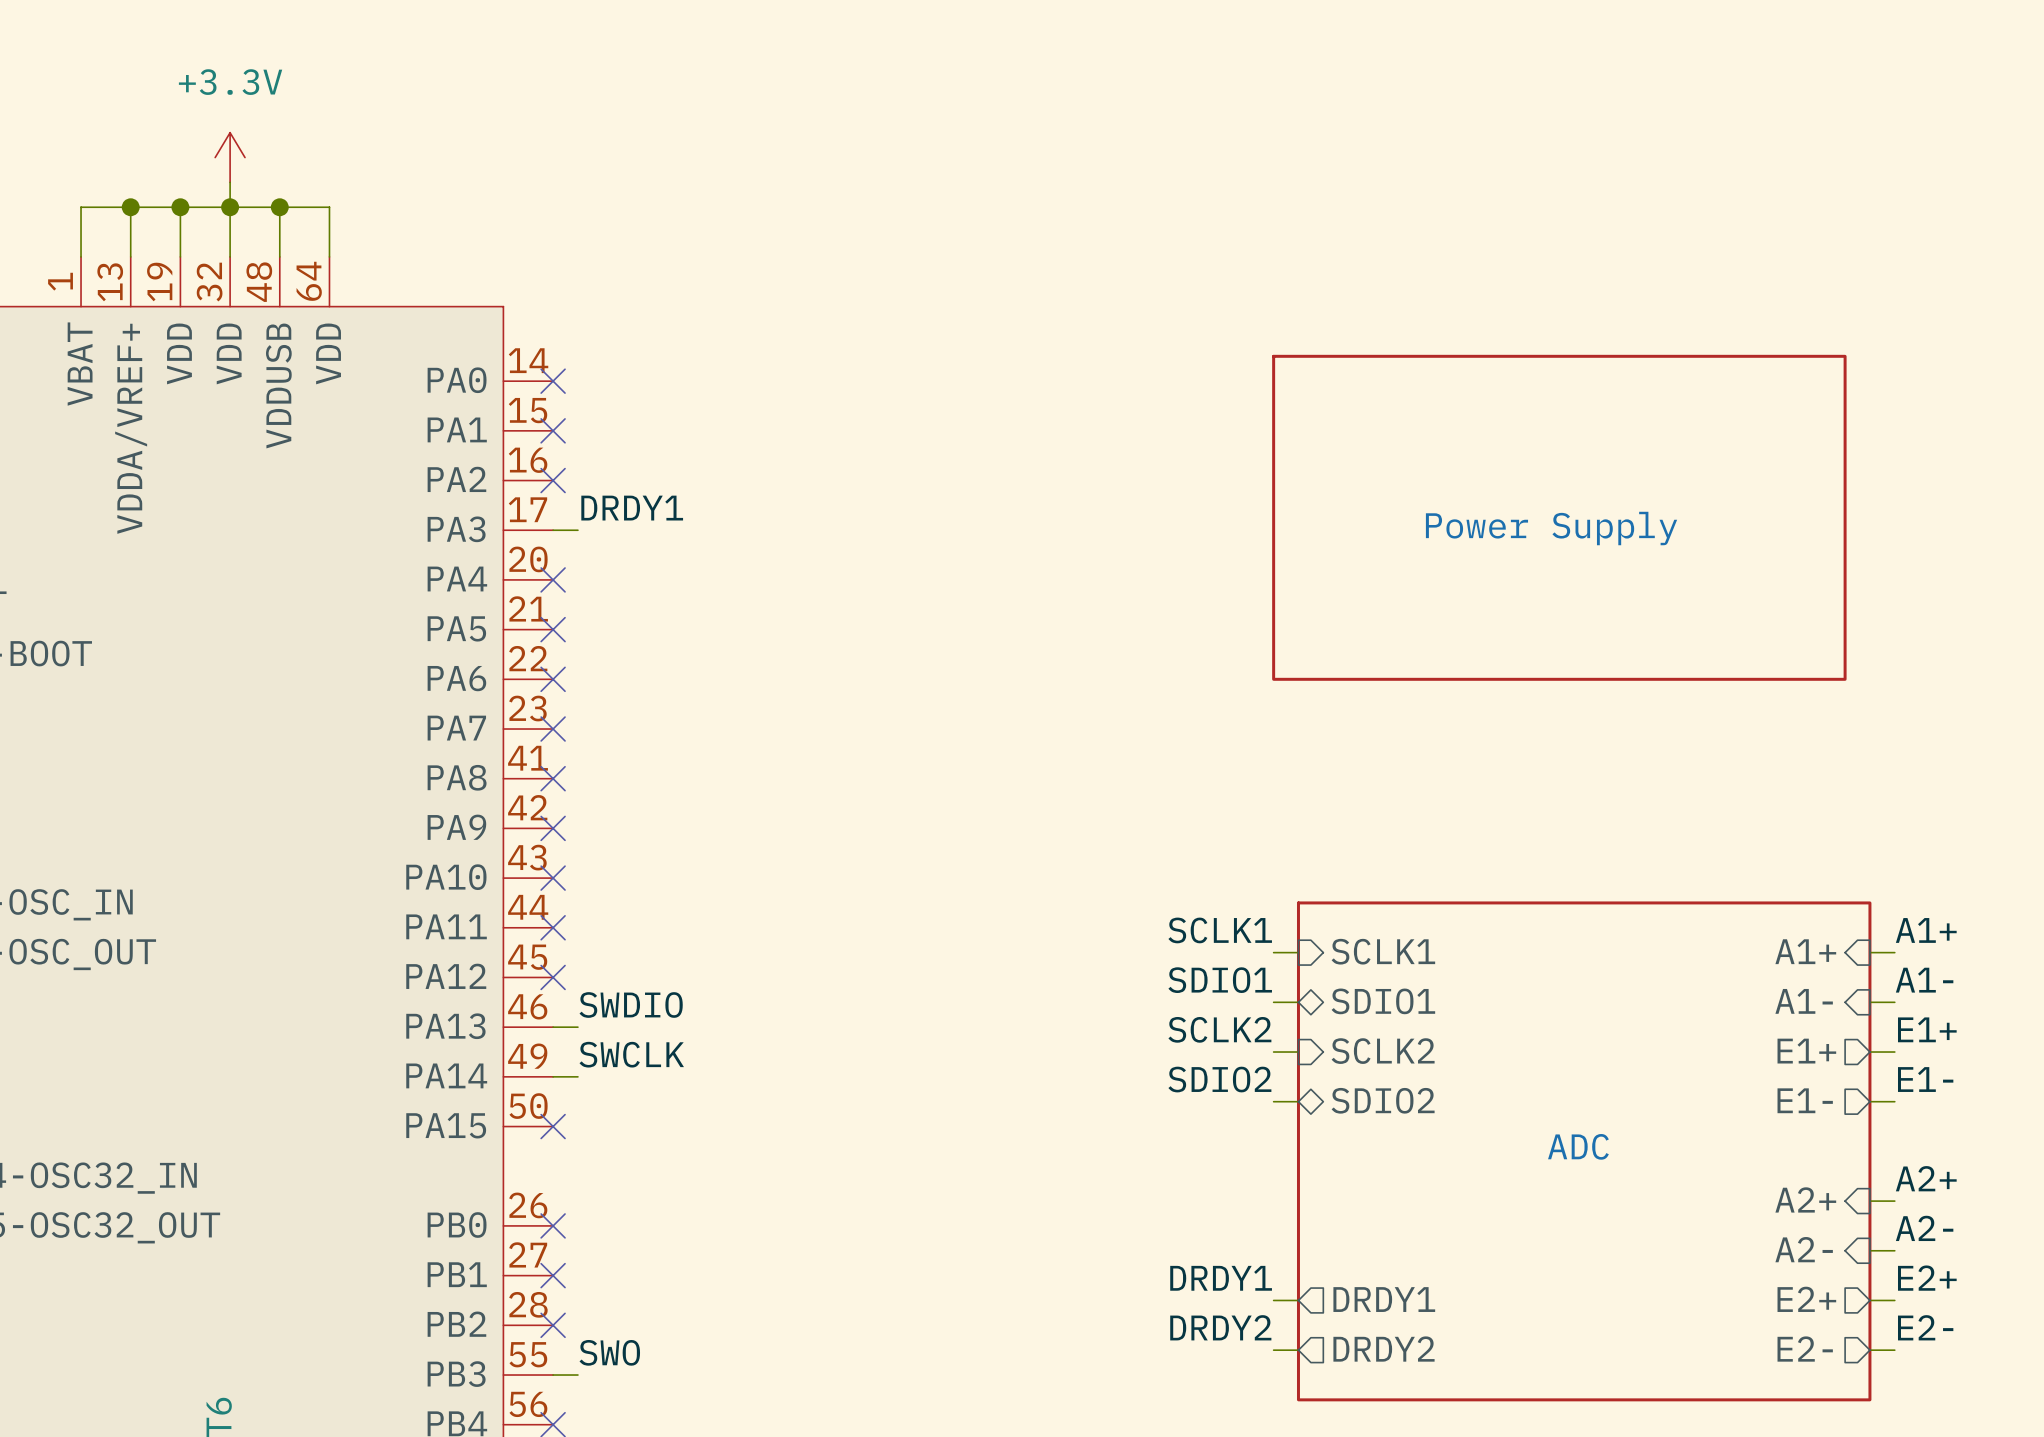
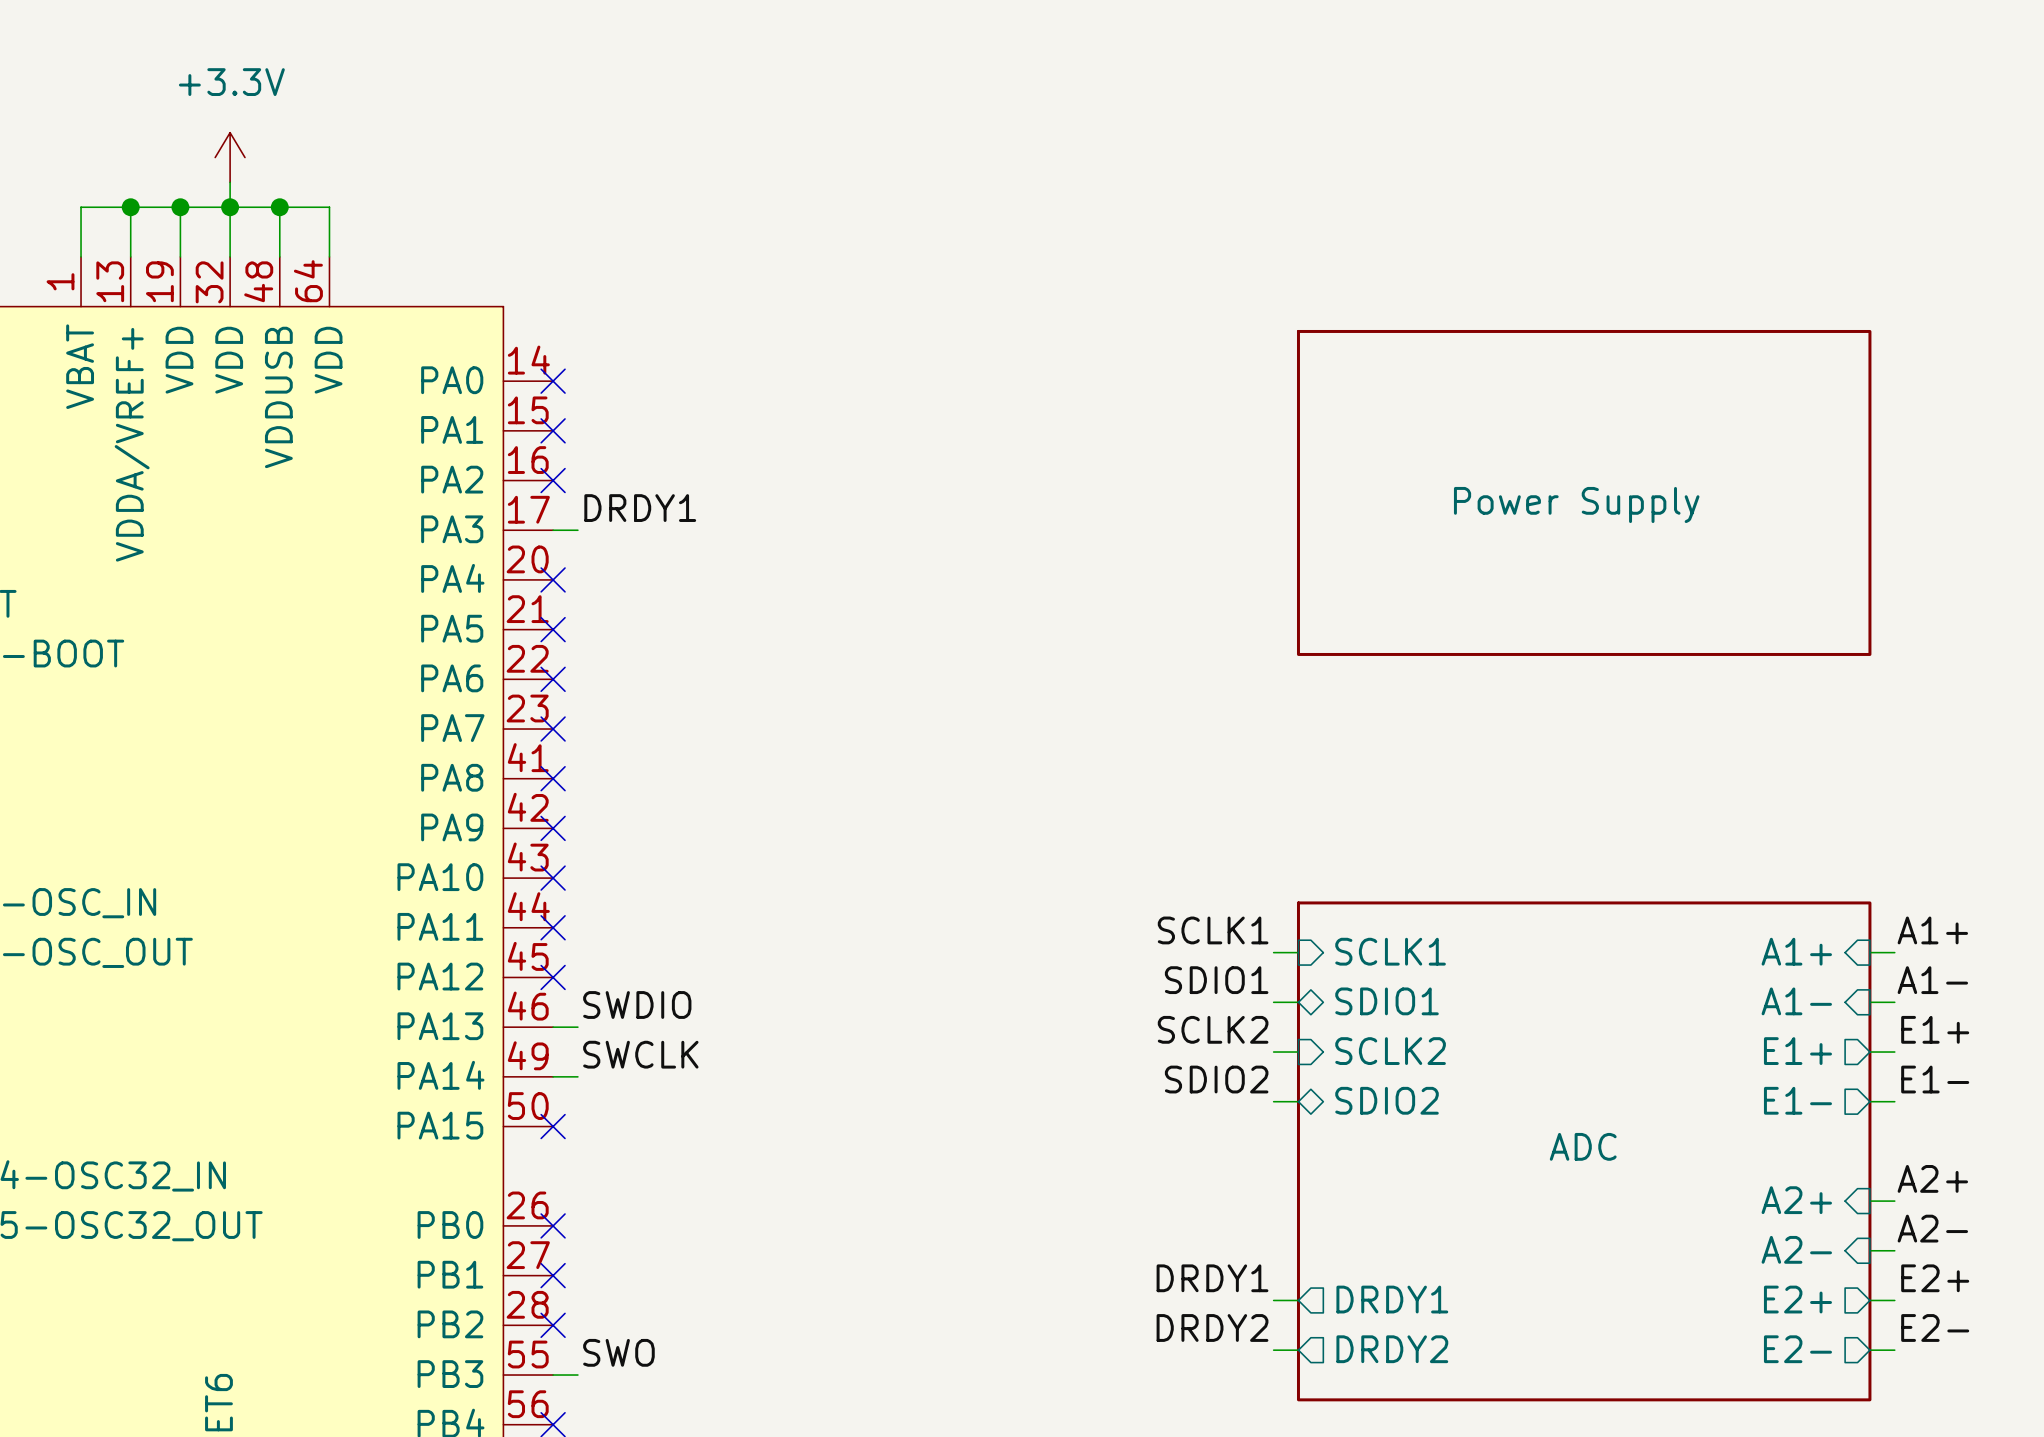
sheet Power Supply position: (1559, 517) -> (1584, 492)

